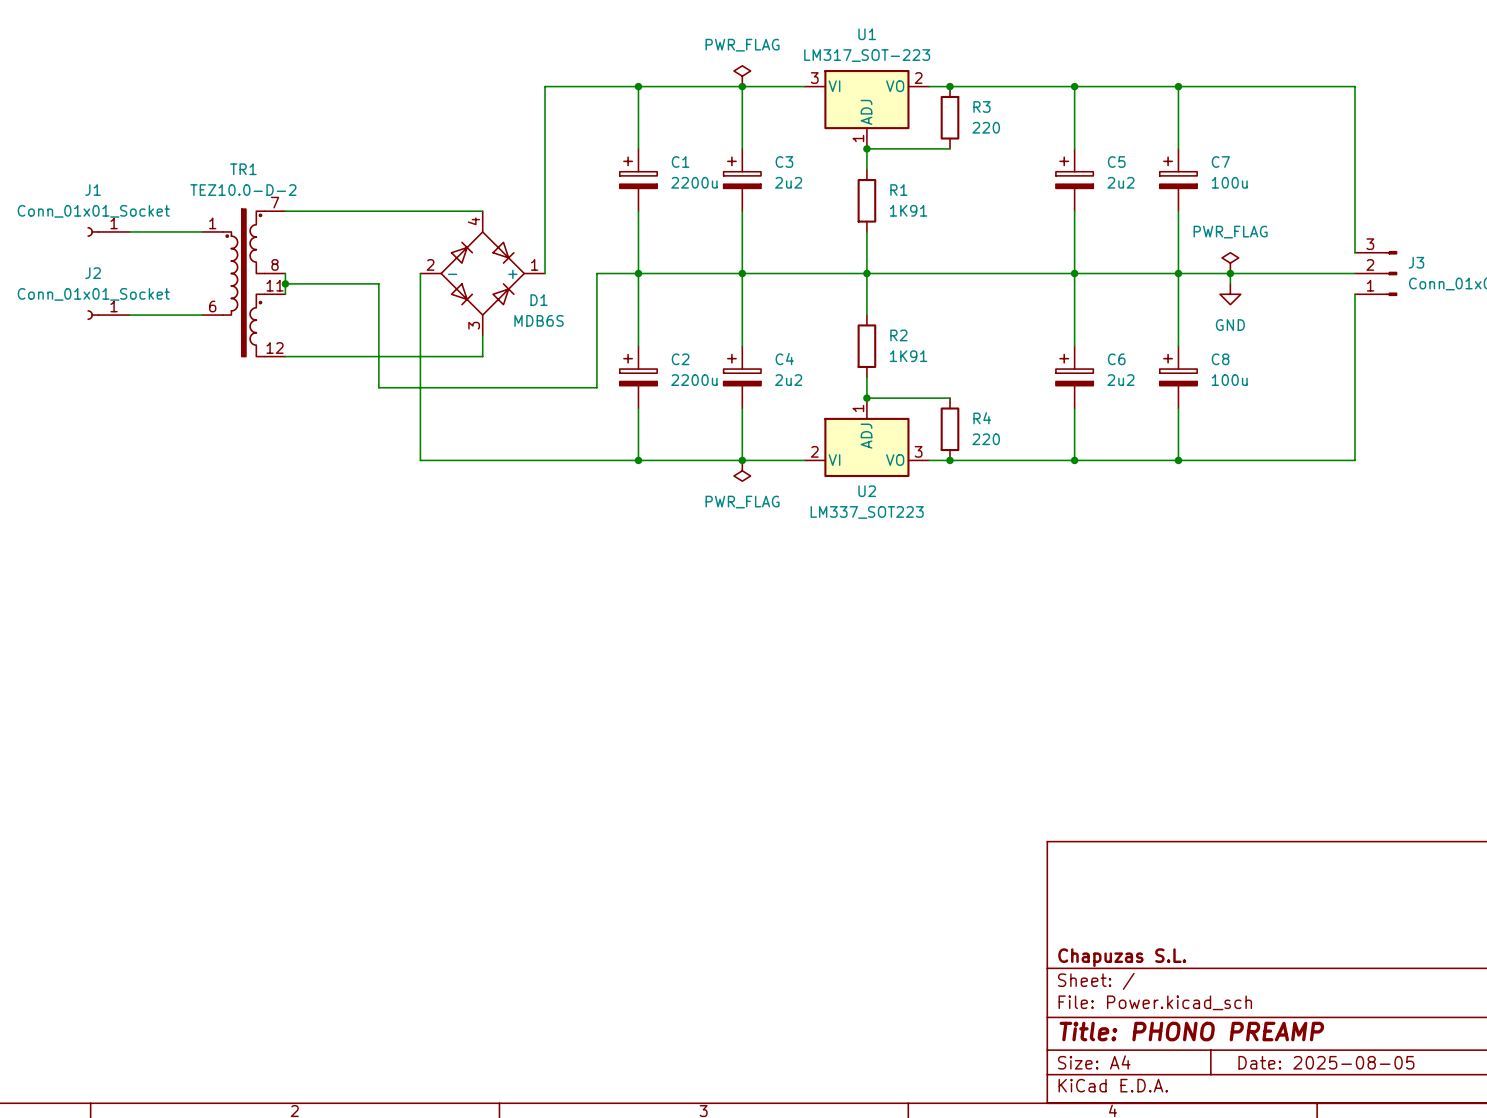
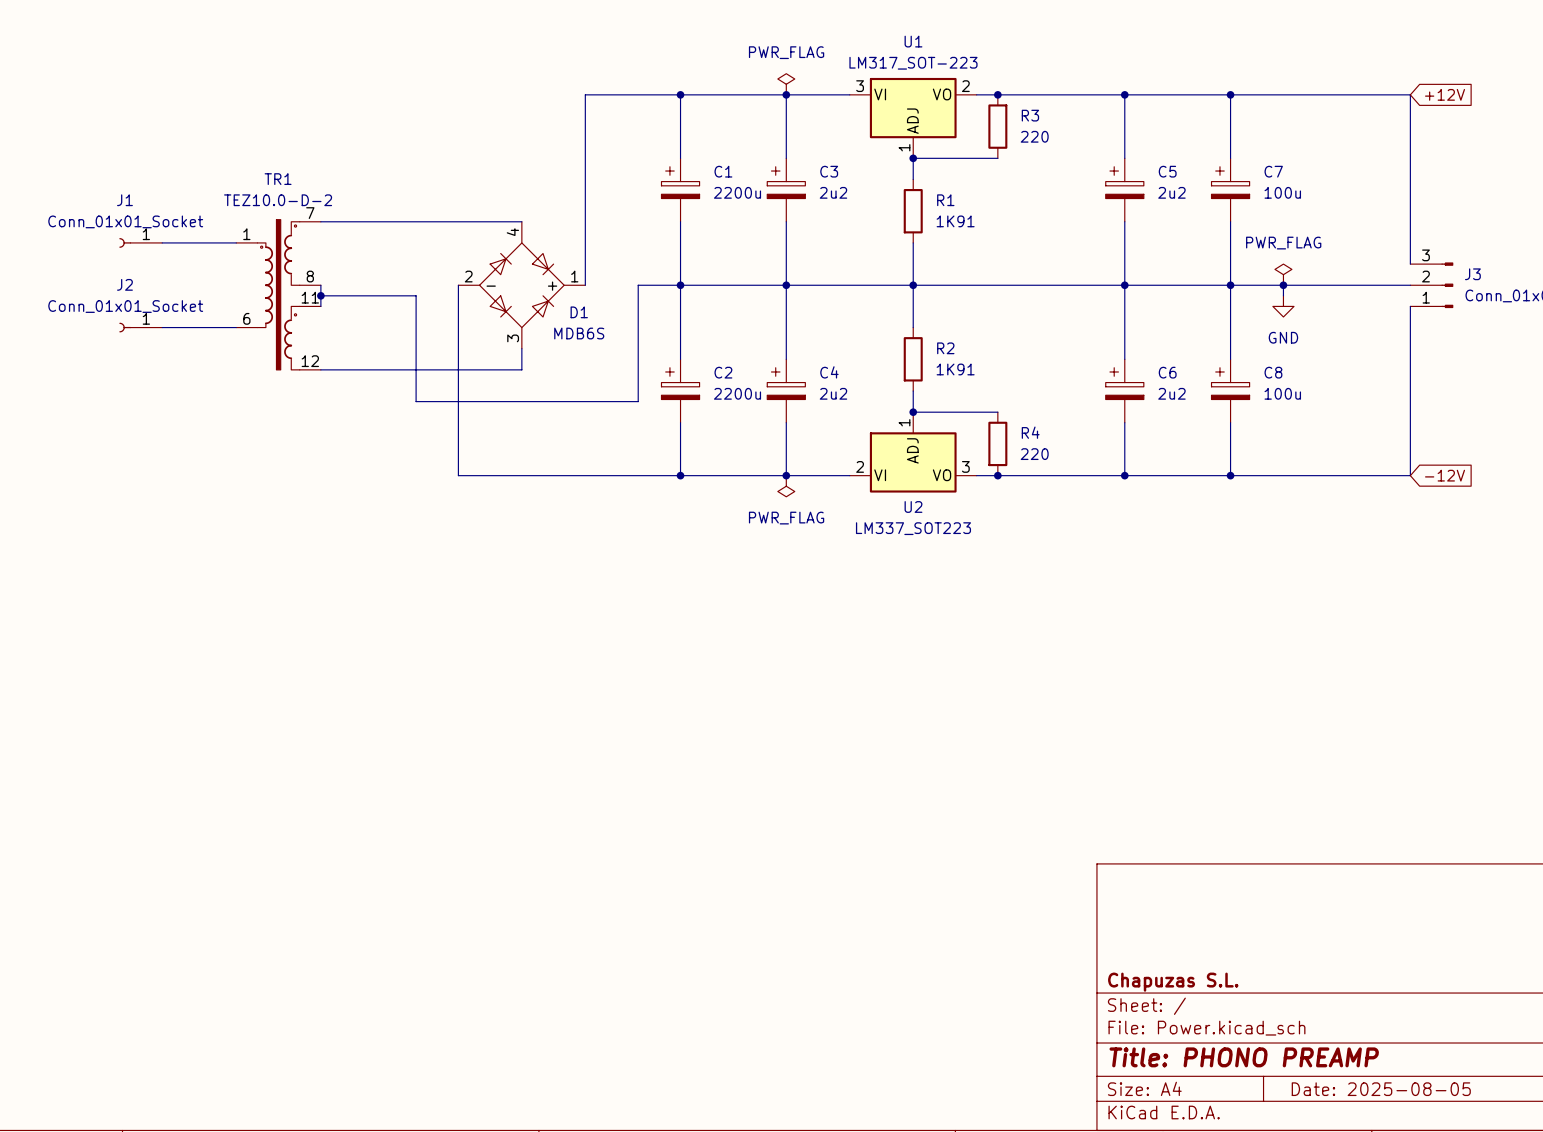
global label: none -> +12V (1445, 94)
global label: none -> -12V (1445, 475)

